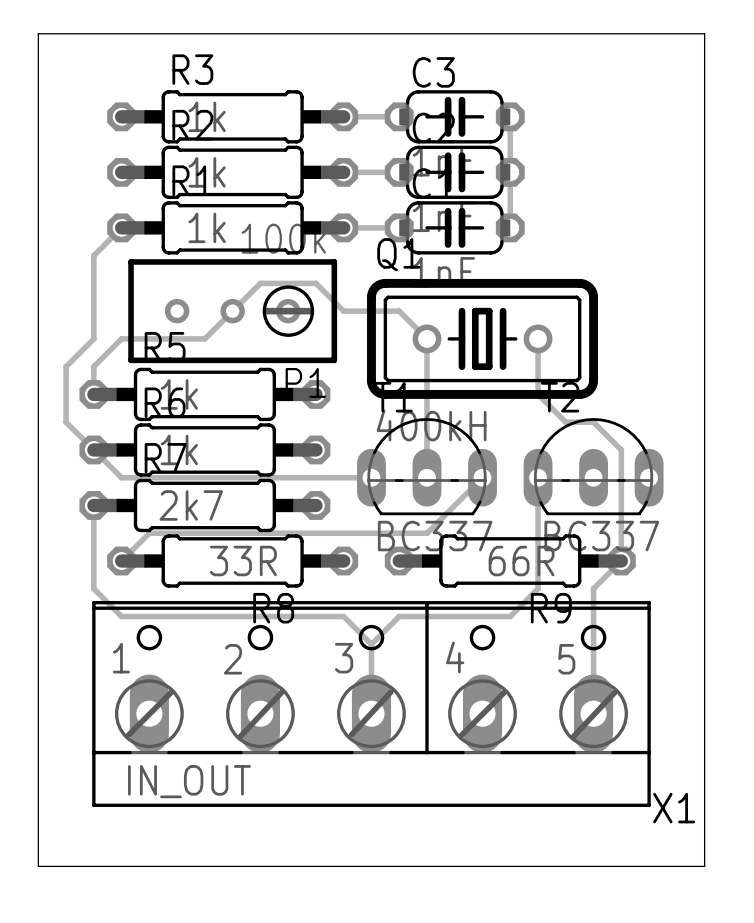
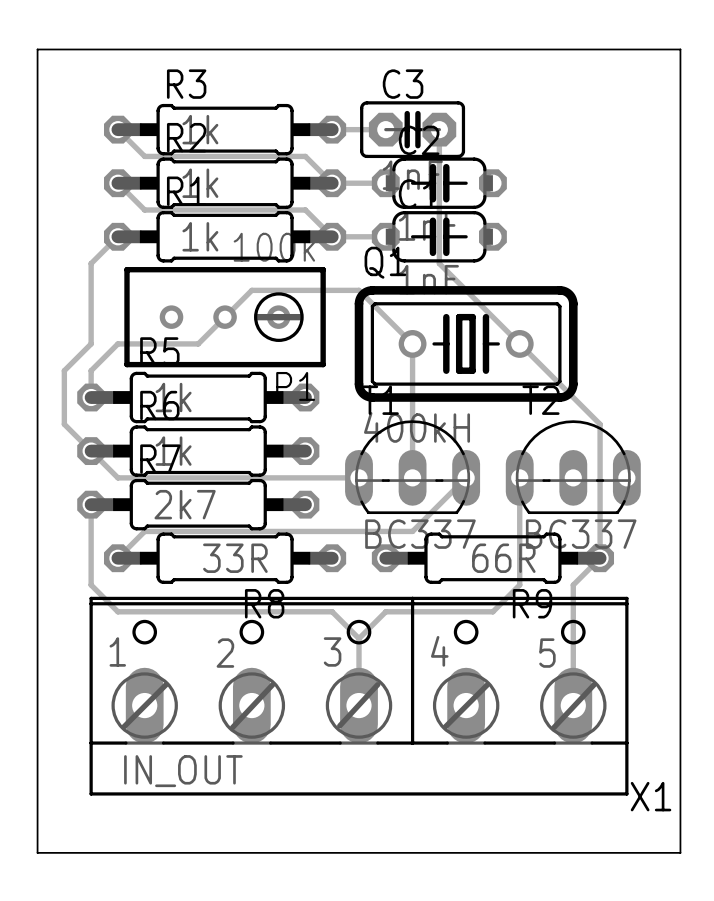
C3 footprint: [384, 90, 525, 144] -> [360, 101, 466, 159]
track: none -> (117, 129) (144, 156) (305, 156) (332, 183)
track: (510, 116) (510, 227) -> none
track: none -> (117, 183) (144, 210) (305, 210) (332, 236)
track: (315, 283) (343, 311) (399, 311) -> (305, 290) (359, 290) (385, 317)
track: (538, 338) (538, 394) (565, 422) (593, 422) (621, 449) -> (439, 129) (439, 263) (600, 424) (600, 451)

